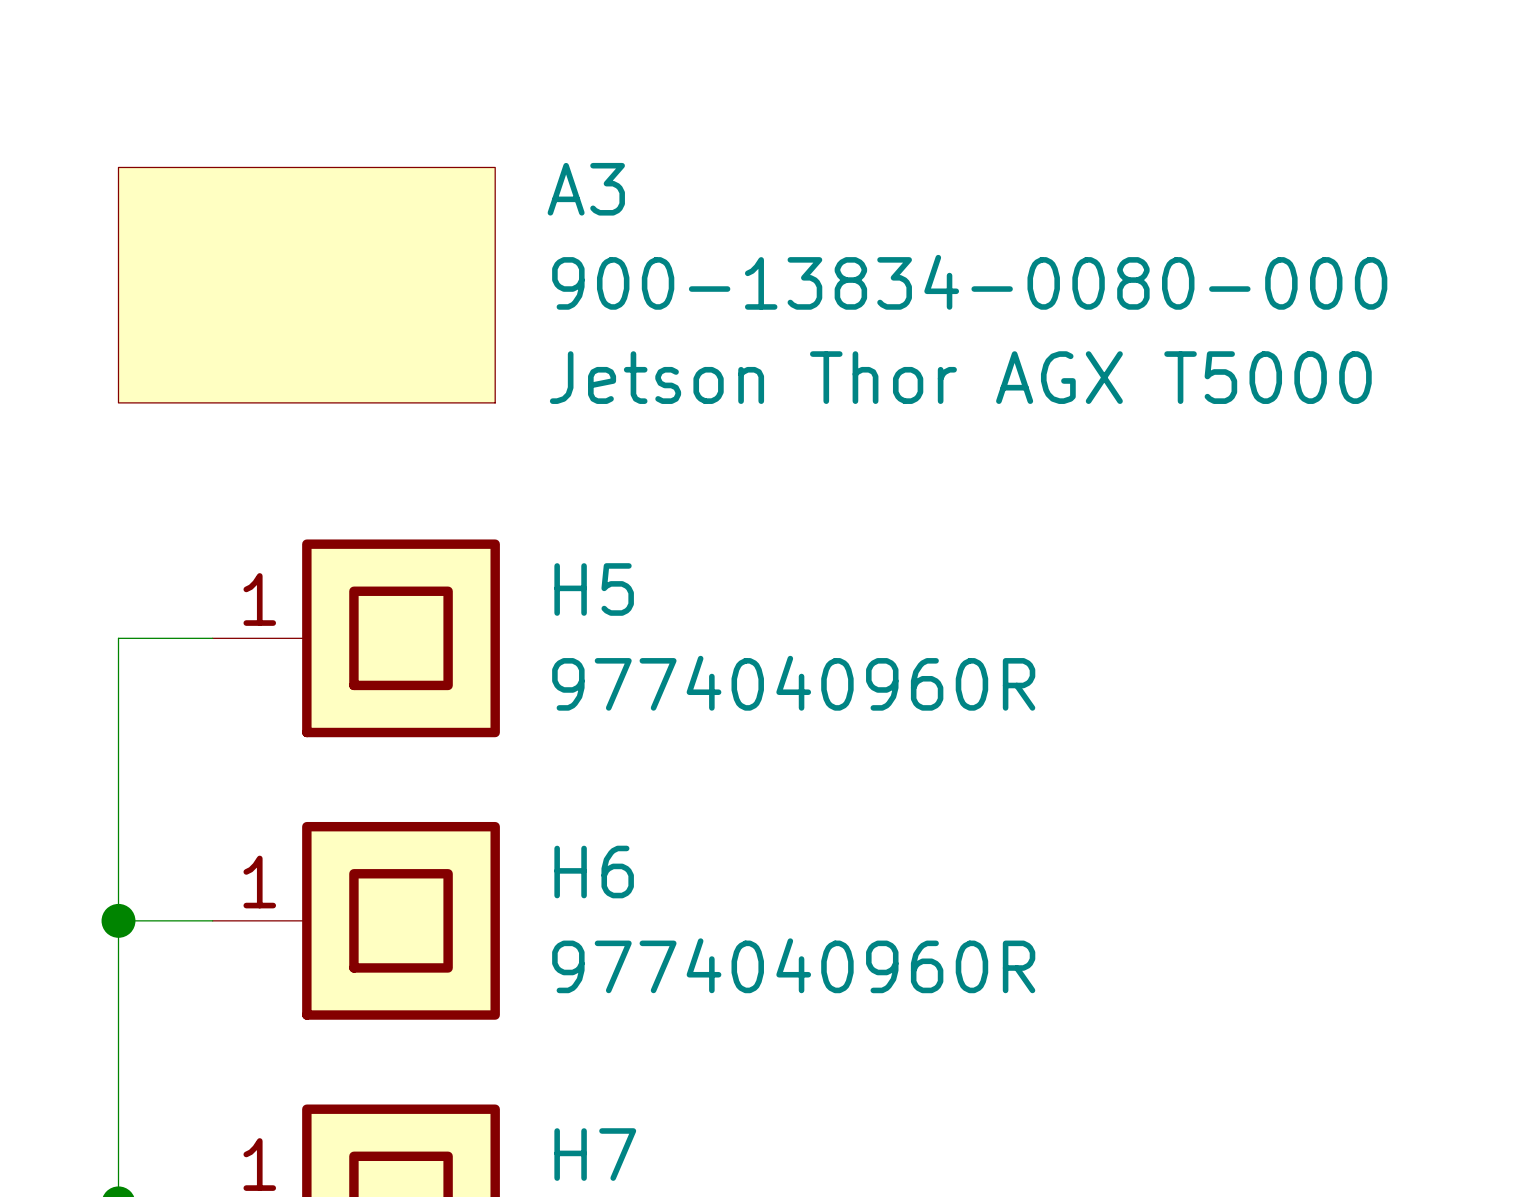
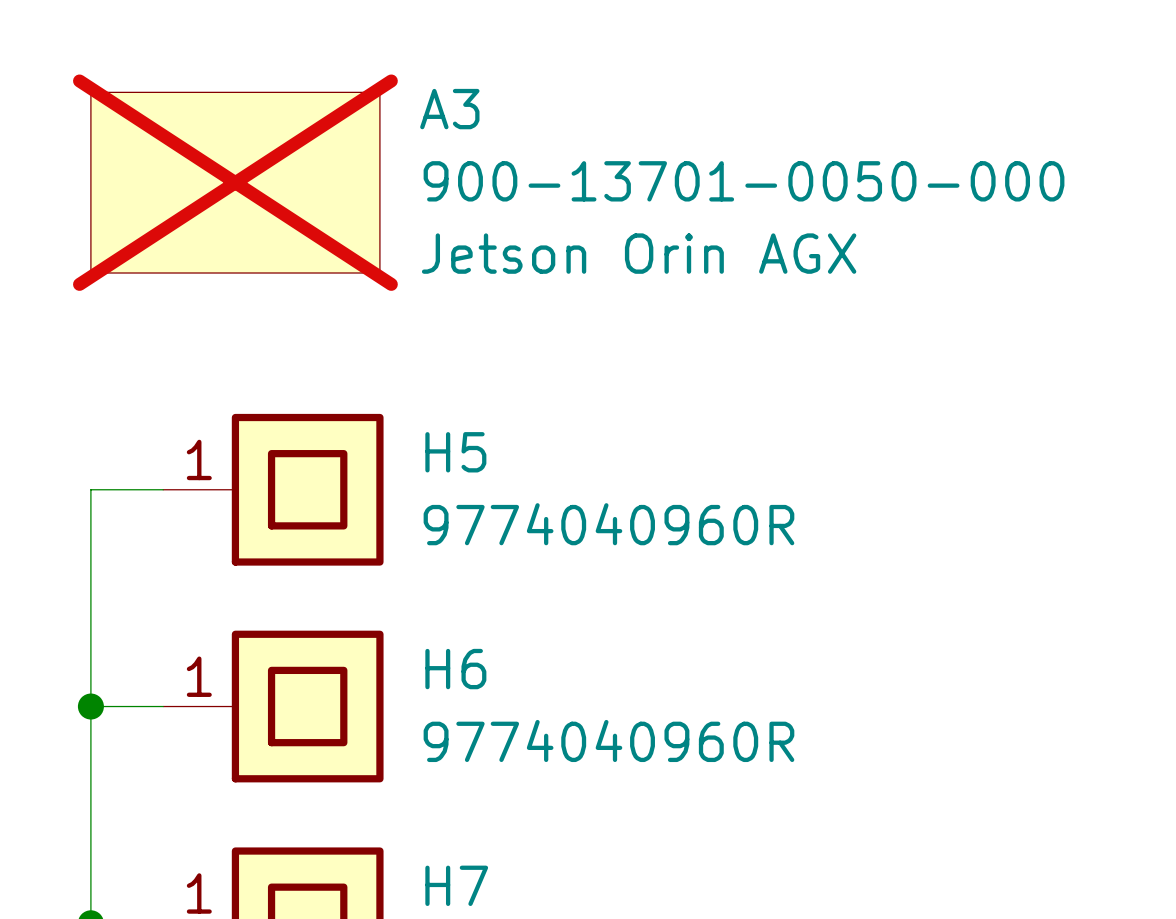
A3 do-not-place cross: none -> (235, 182)
A3 text: 900-13834-0080-000 (969, 282) -> 900-13701-0050-000 (744, 181)
A3 position: (306, 285) -> (235, 182)
A3 text: Jetson Thor AGX T5000 (960, 377) -> Jetson Orin AGX (639, 253)

